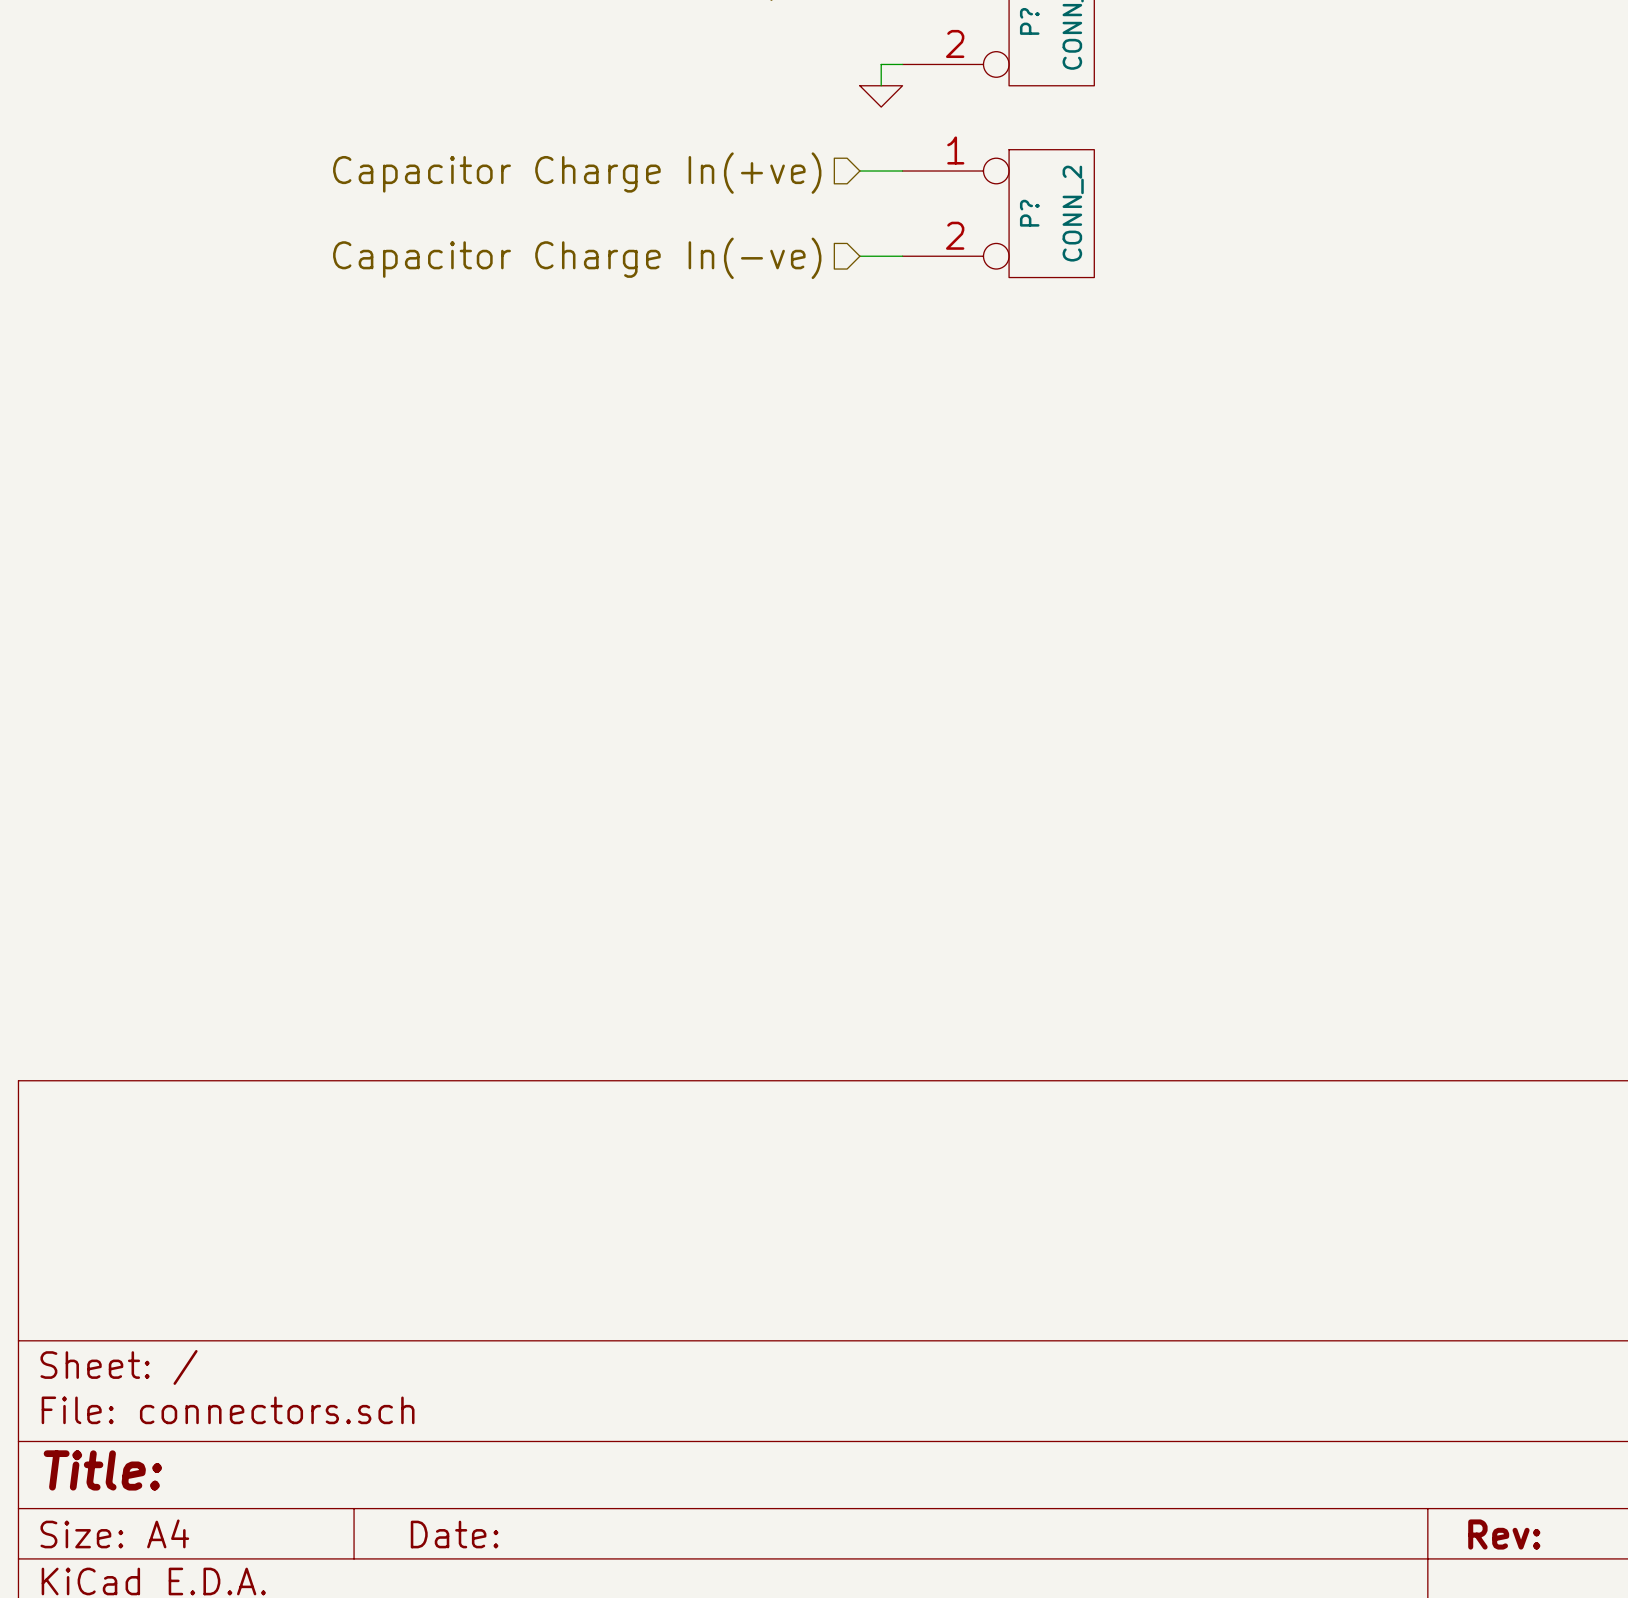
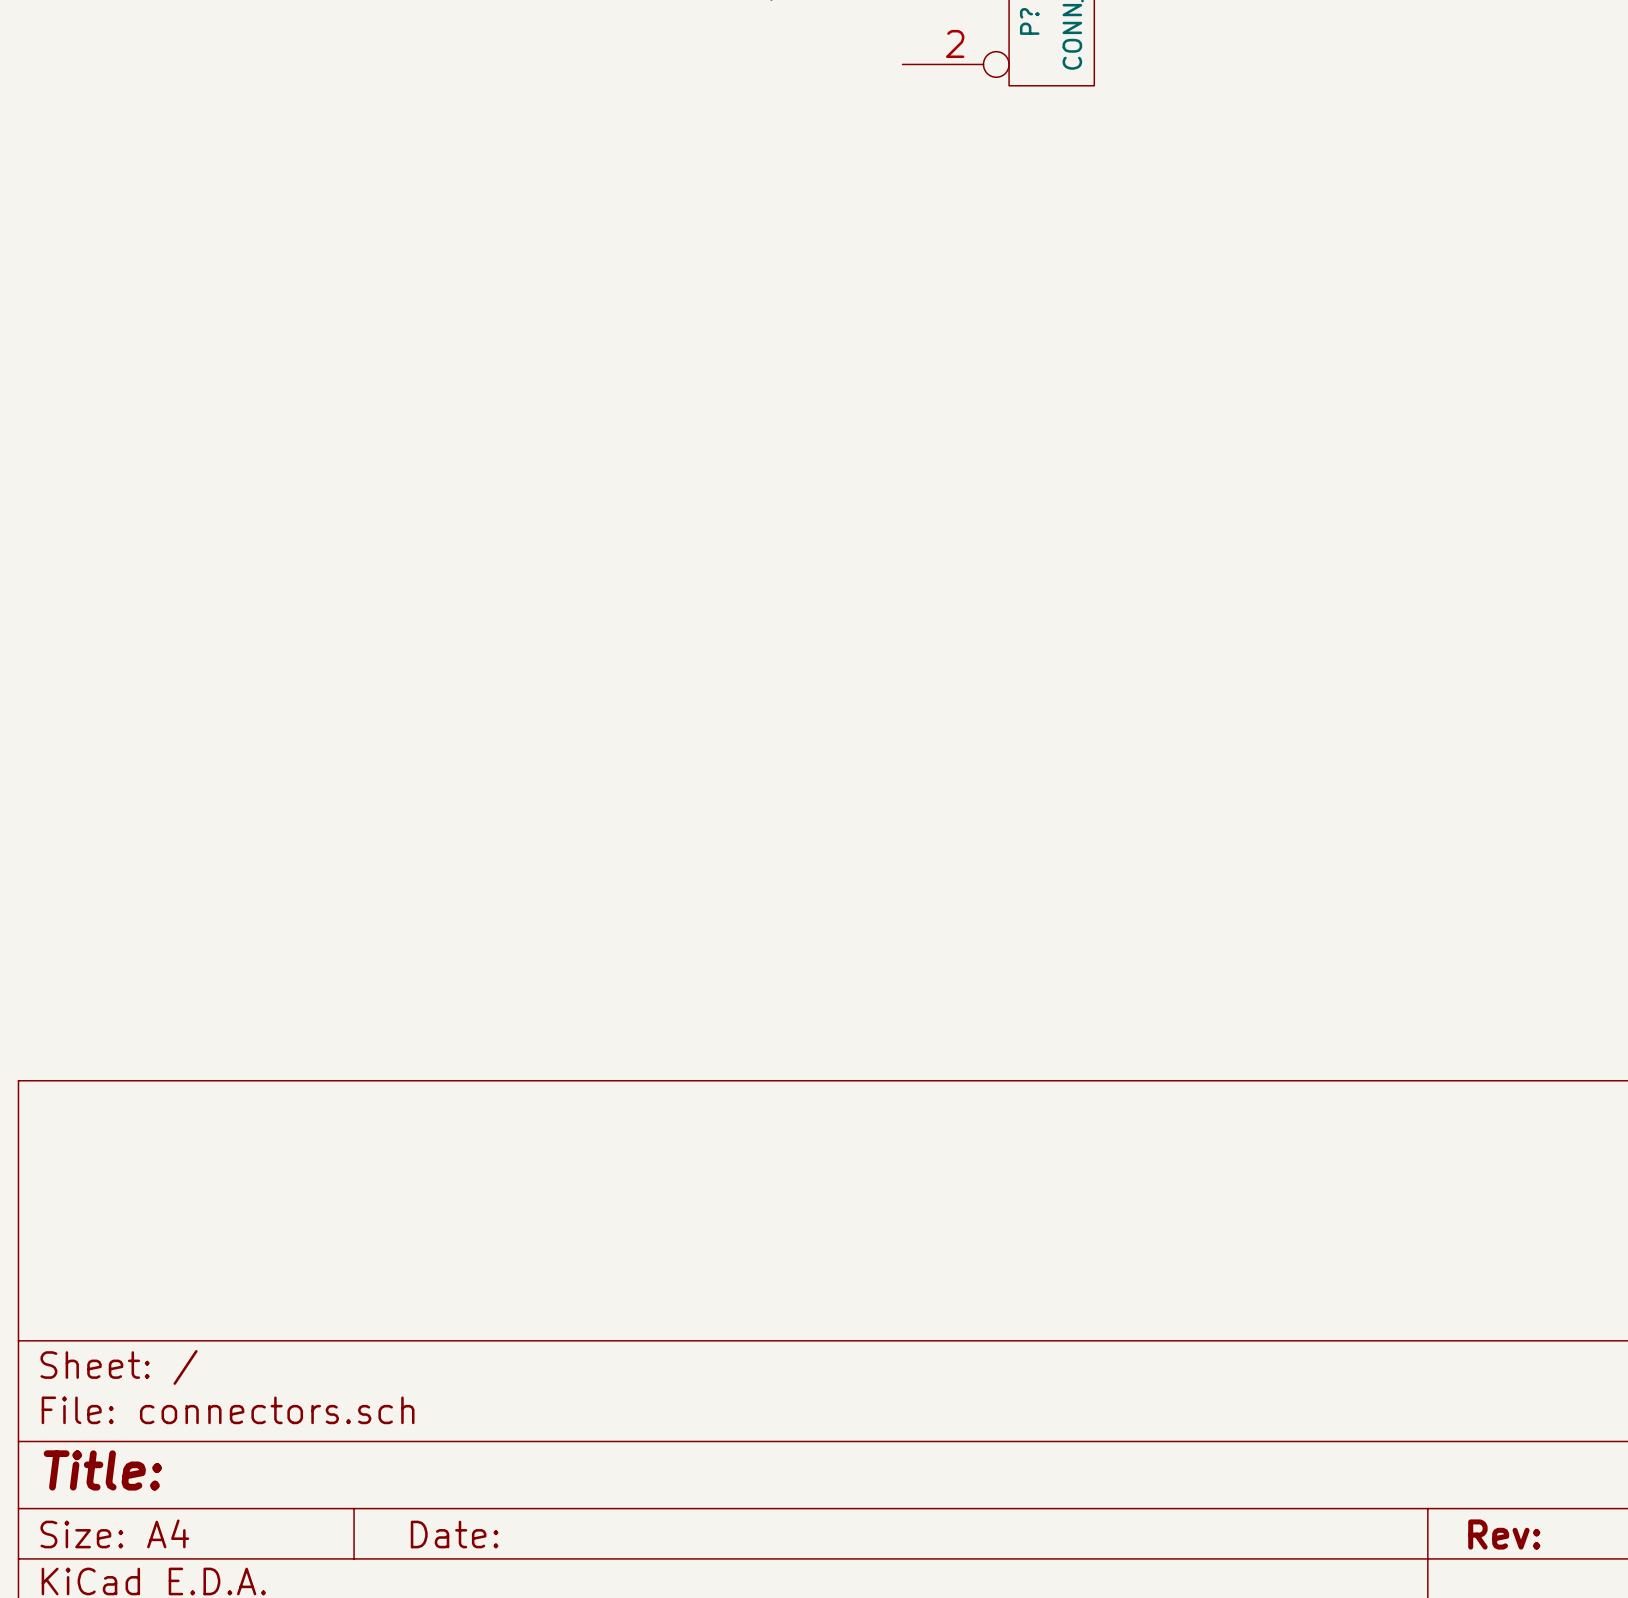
wire: (902, 64) (881, 64) (881, 85) -> none
power symbol: (881, 96) -> none
wire: (859, 171) (902, 171) -> none
hierarchical label: Capacitor Charge In(+ve) (577, 173) -> none
P?: CONN_2 (998, 213) -> none
wire: (859, 256) (902, 256) -> none
hierarchical label: Capacitor Charge In(-ve) (577, 258) -> none

